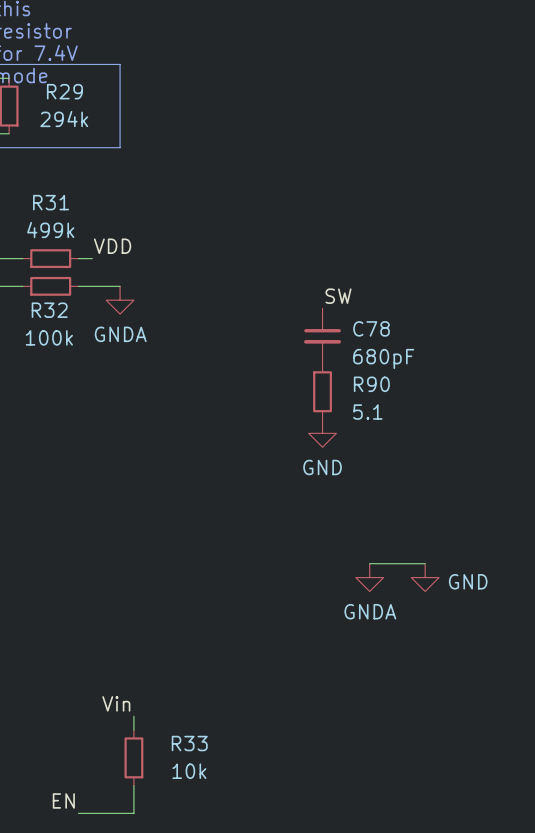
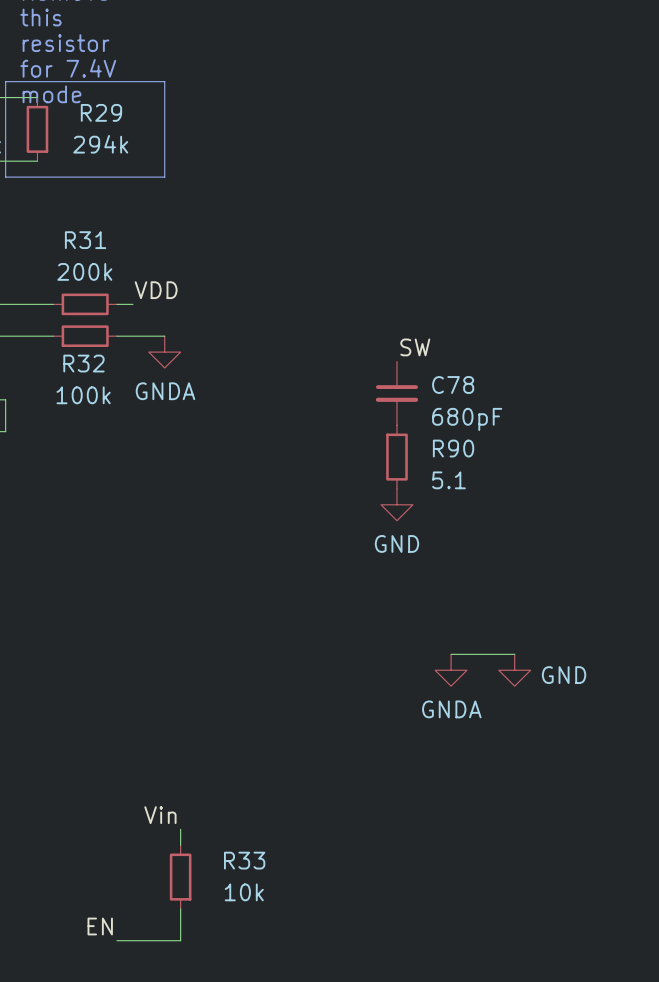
R31 value: 499k (50, 229) -> 200k (84, 271)

